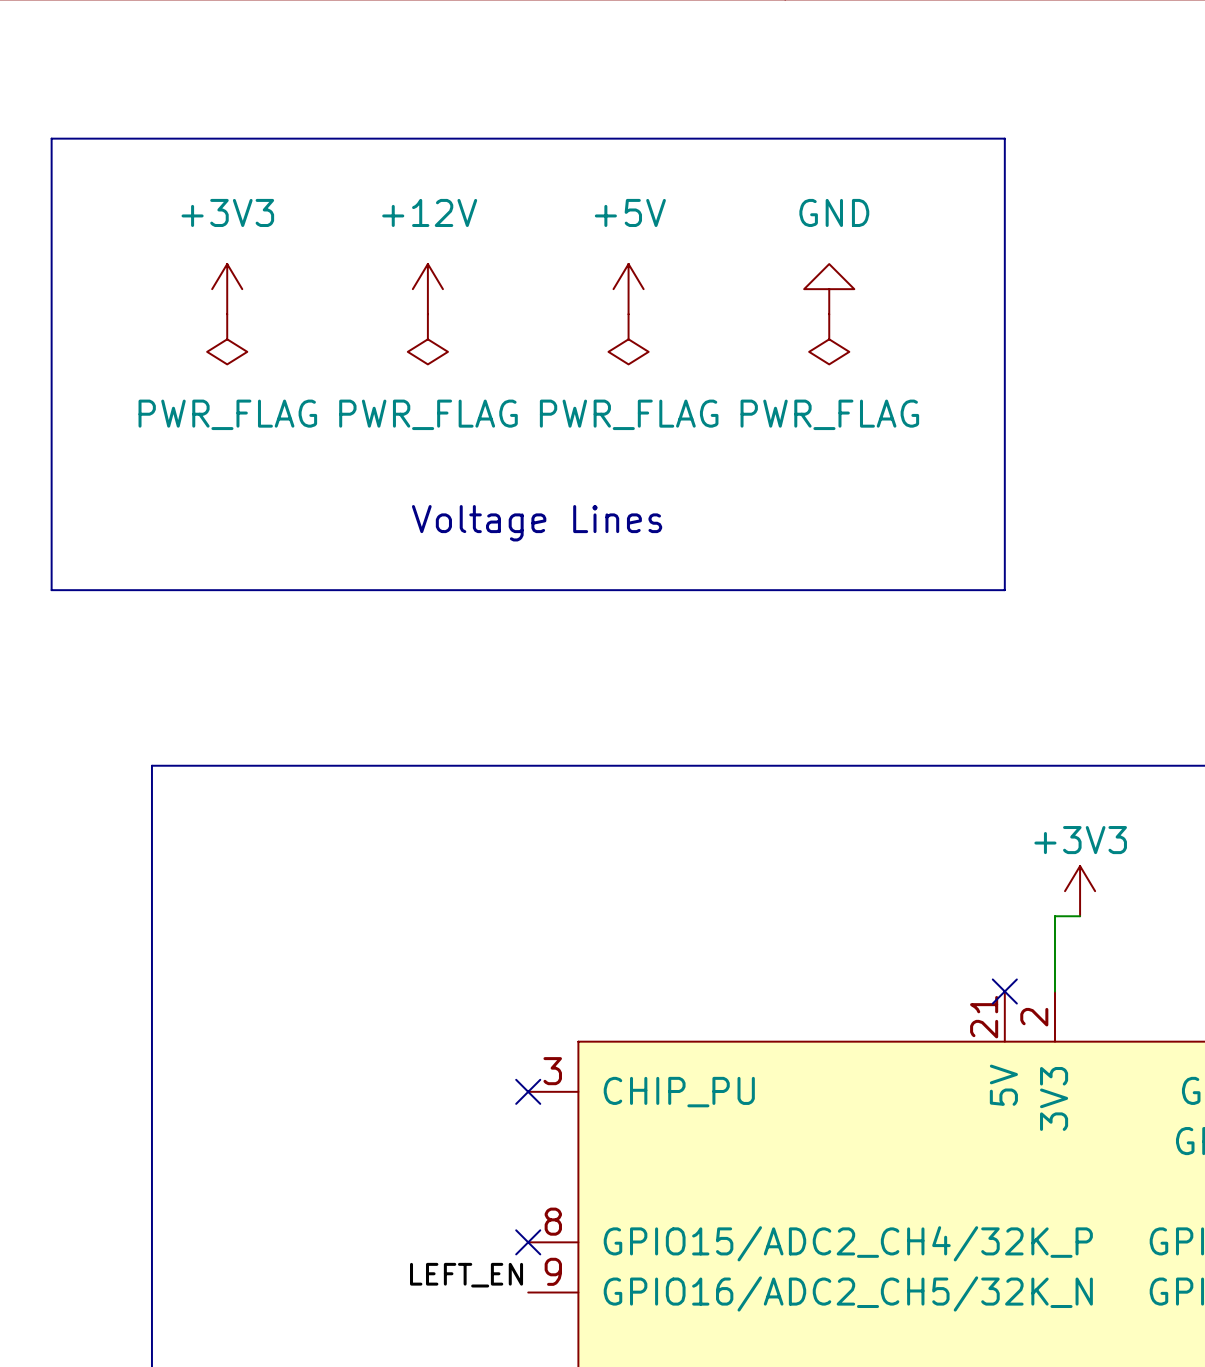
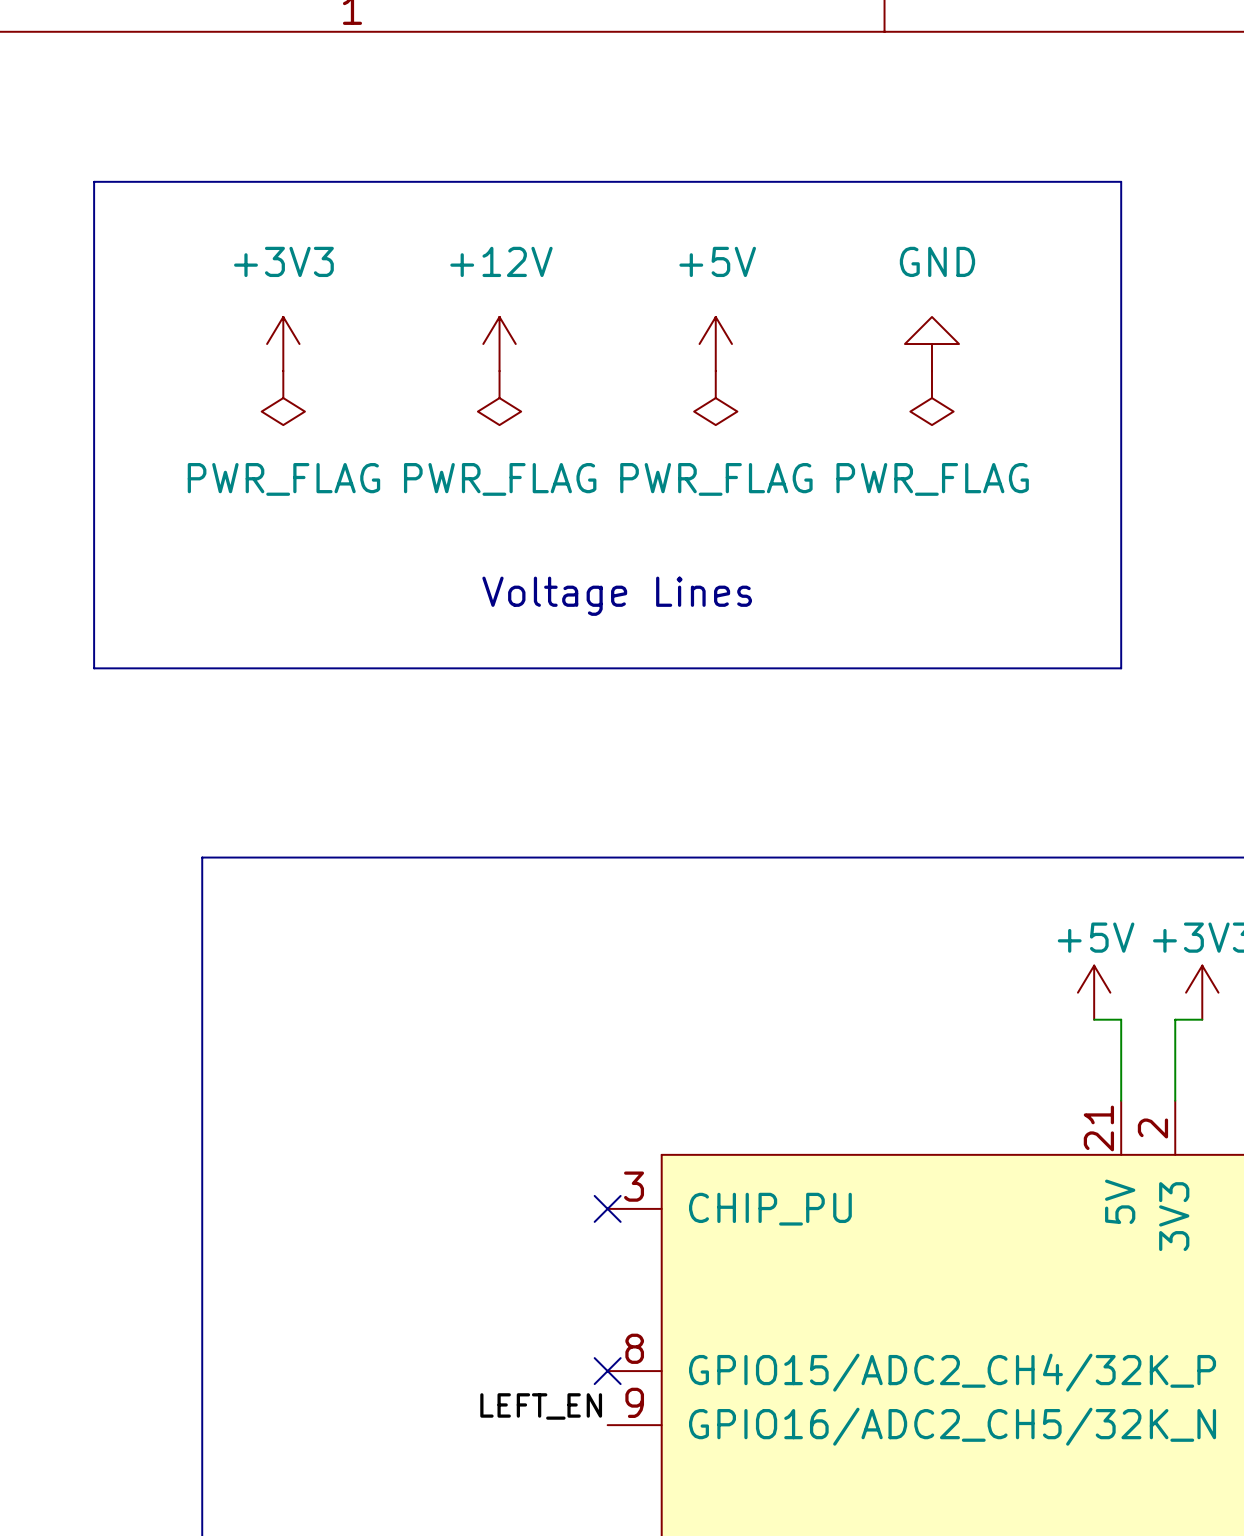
power symbol: none -> +5V (1094, 992)
wire: none -> (1094, 1019) (1121, 1019) (1121, 1100)
no-connect mark: (1004, 991) -> none

